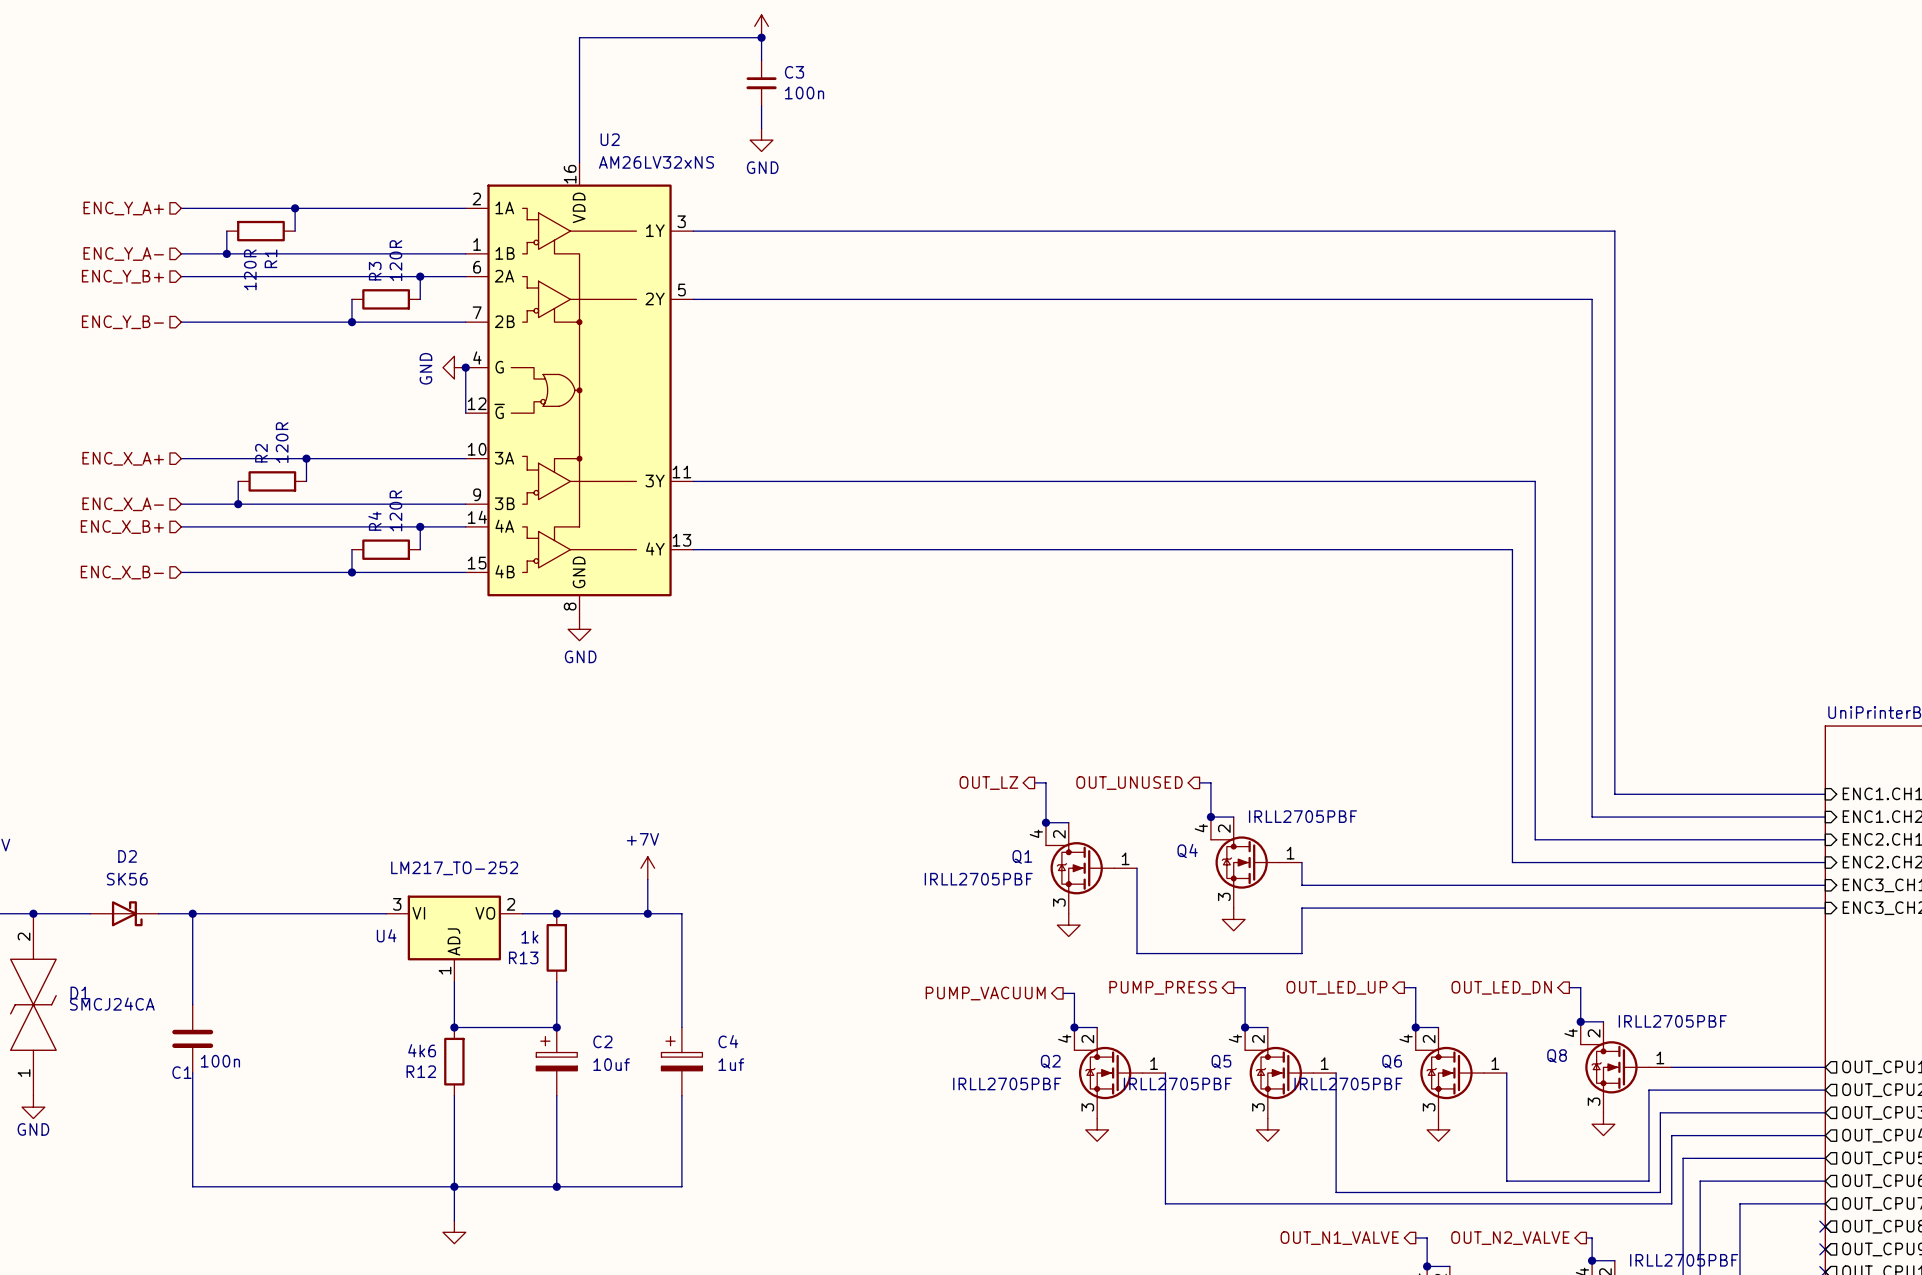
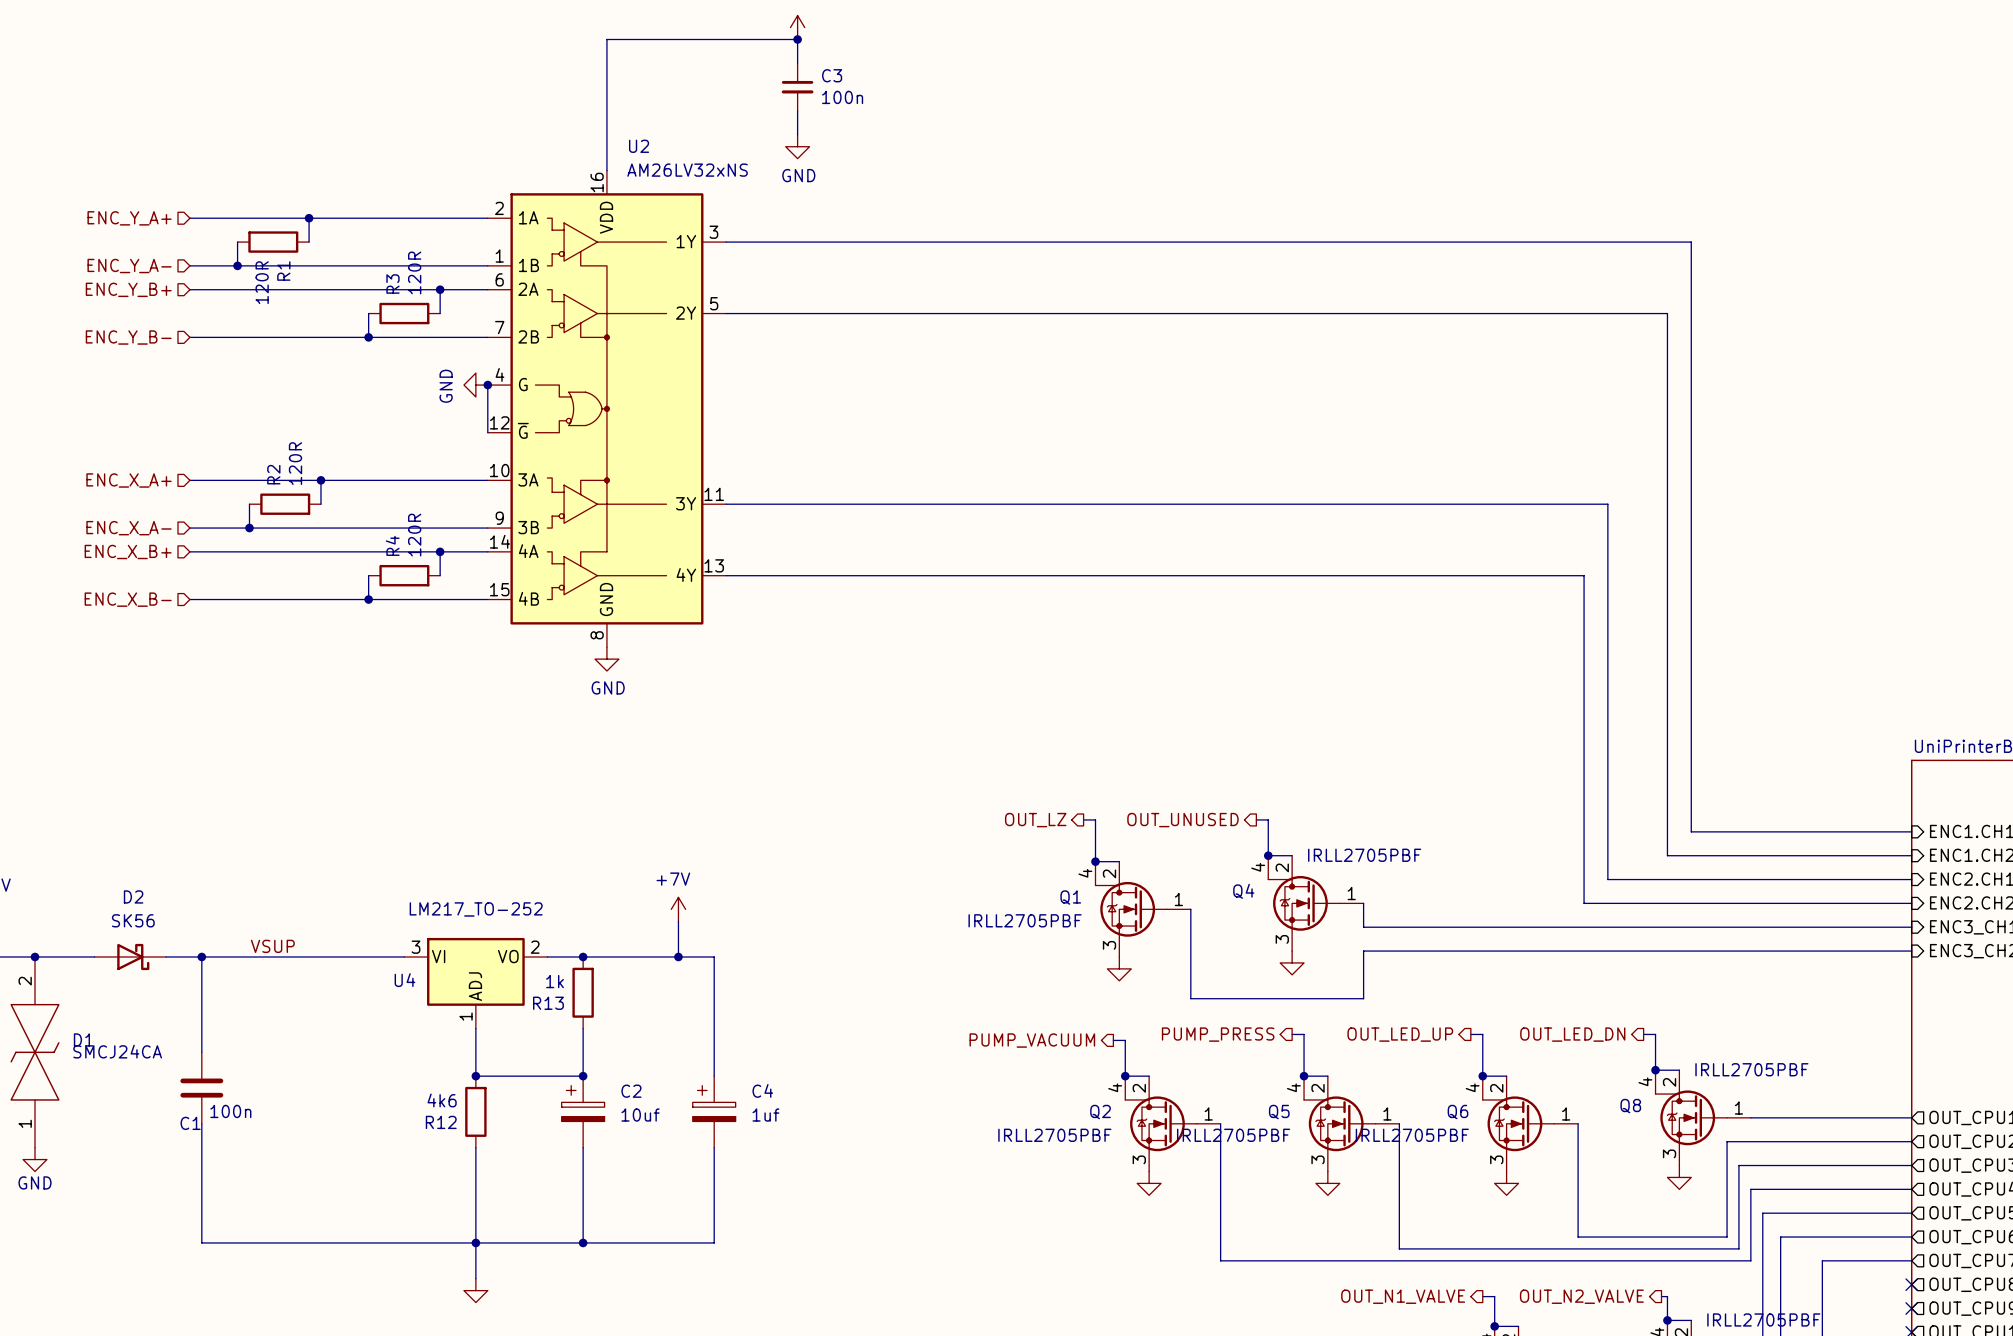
label: none -> VSUP (272, 946)

